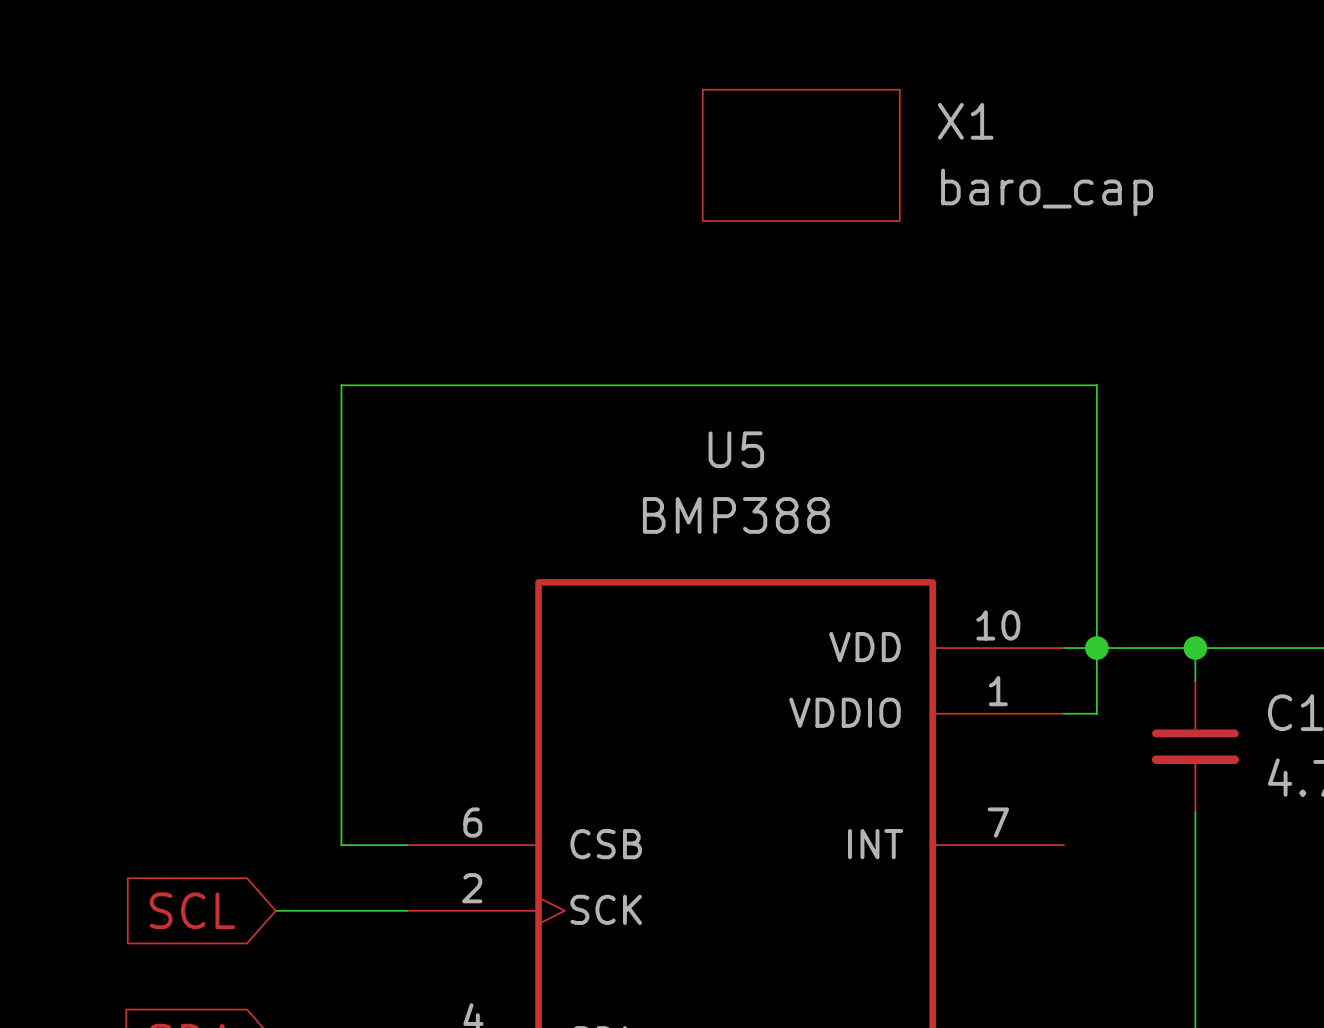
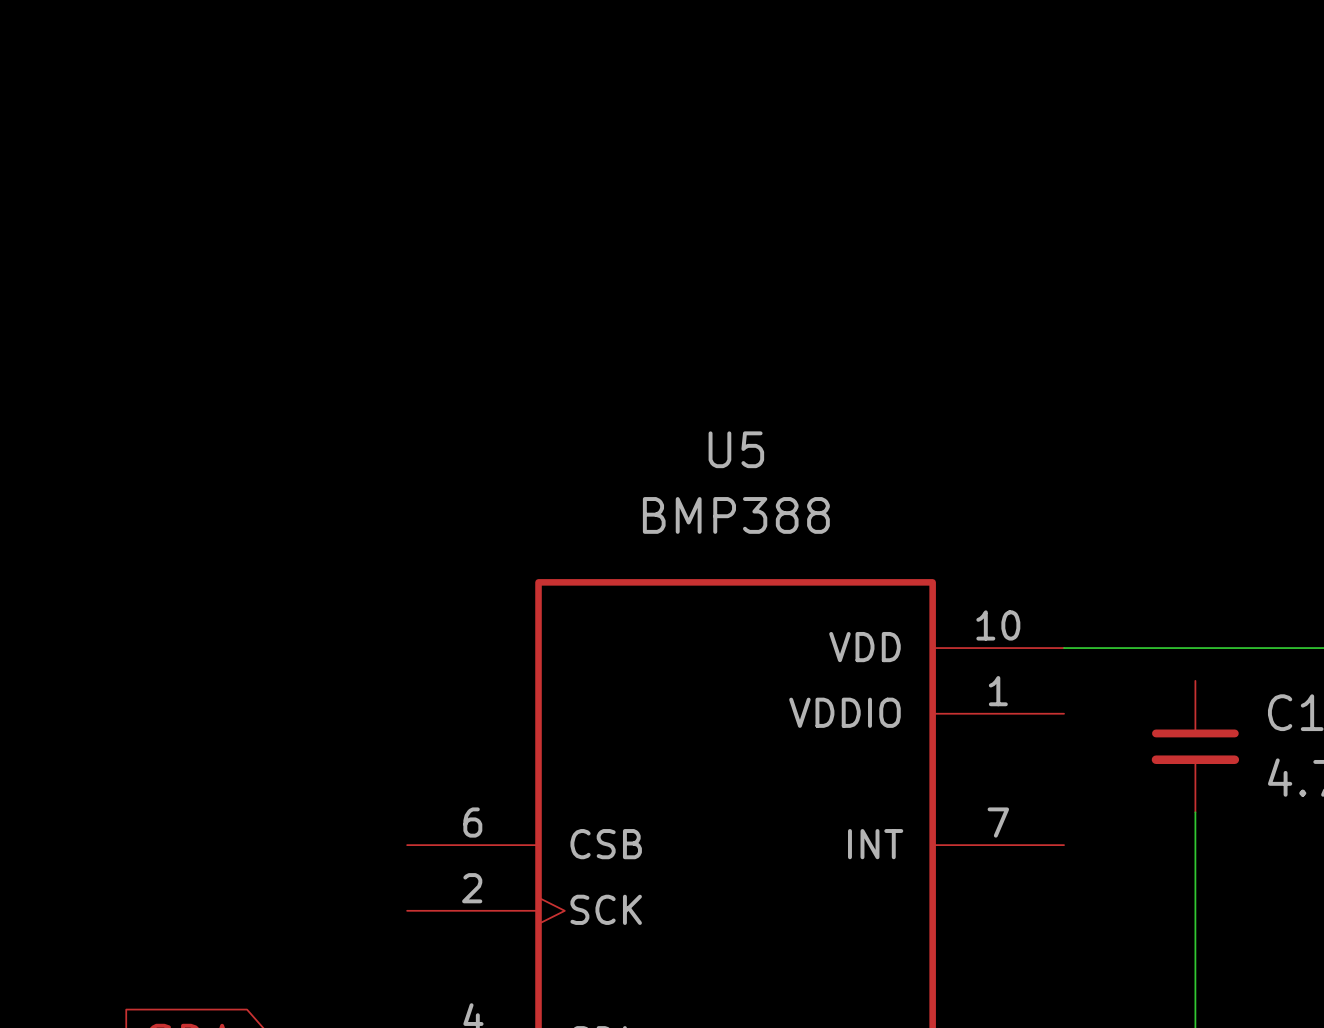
X1: baro_cap (801, 155) -> none
junction: (1096, 648) -> none
wire: (1195, 648) (1195, 680) -> none
junction: (1195, 648) -> none
wire: (1064, 713) (1096, 713) (1096, 385) (341, 385) (341, 845) (407, 845) -> none
global label: SCL (192, 910) -> none
wire: (275, 910) (407, 910) -> none

